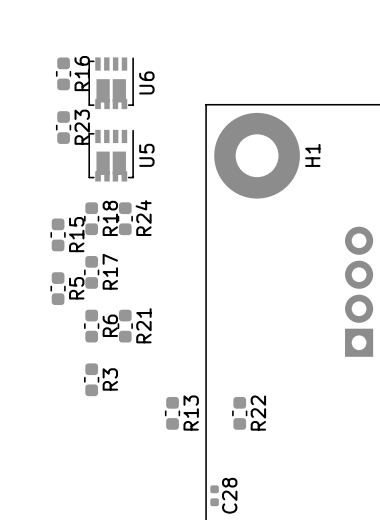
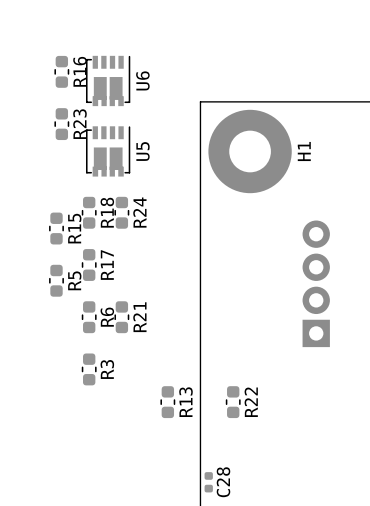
part position: (359, 291) -> (316, 283)

